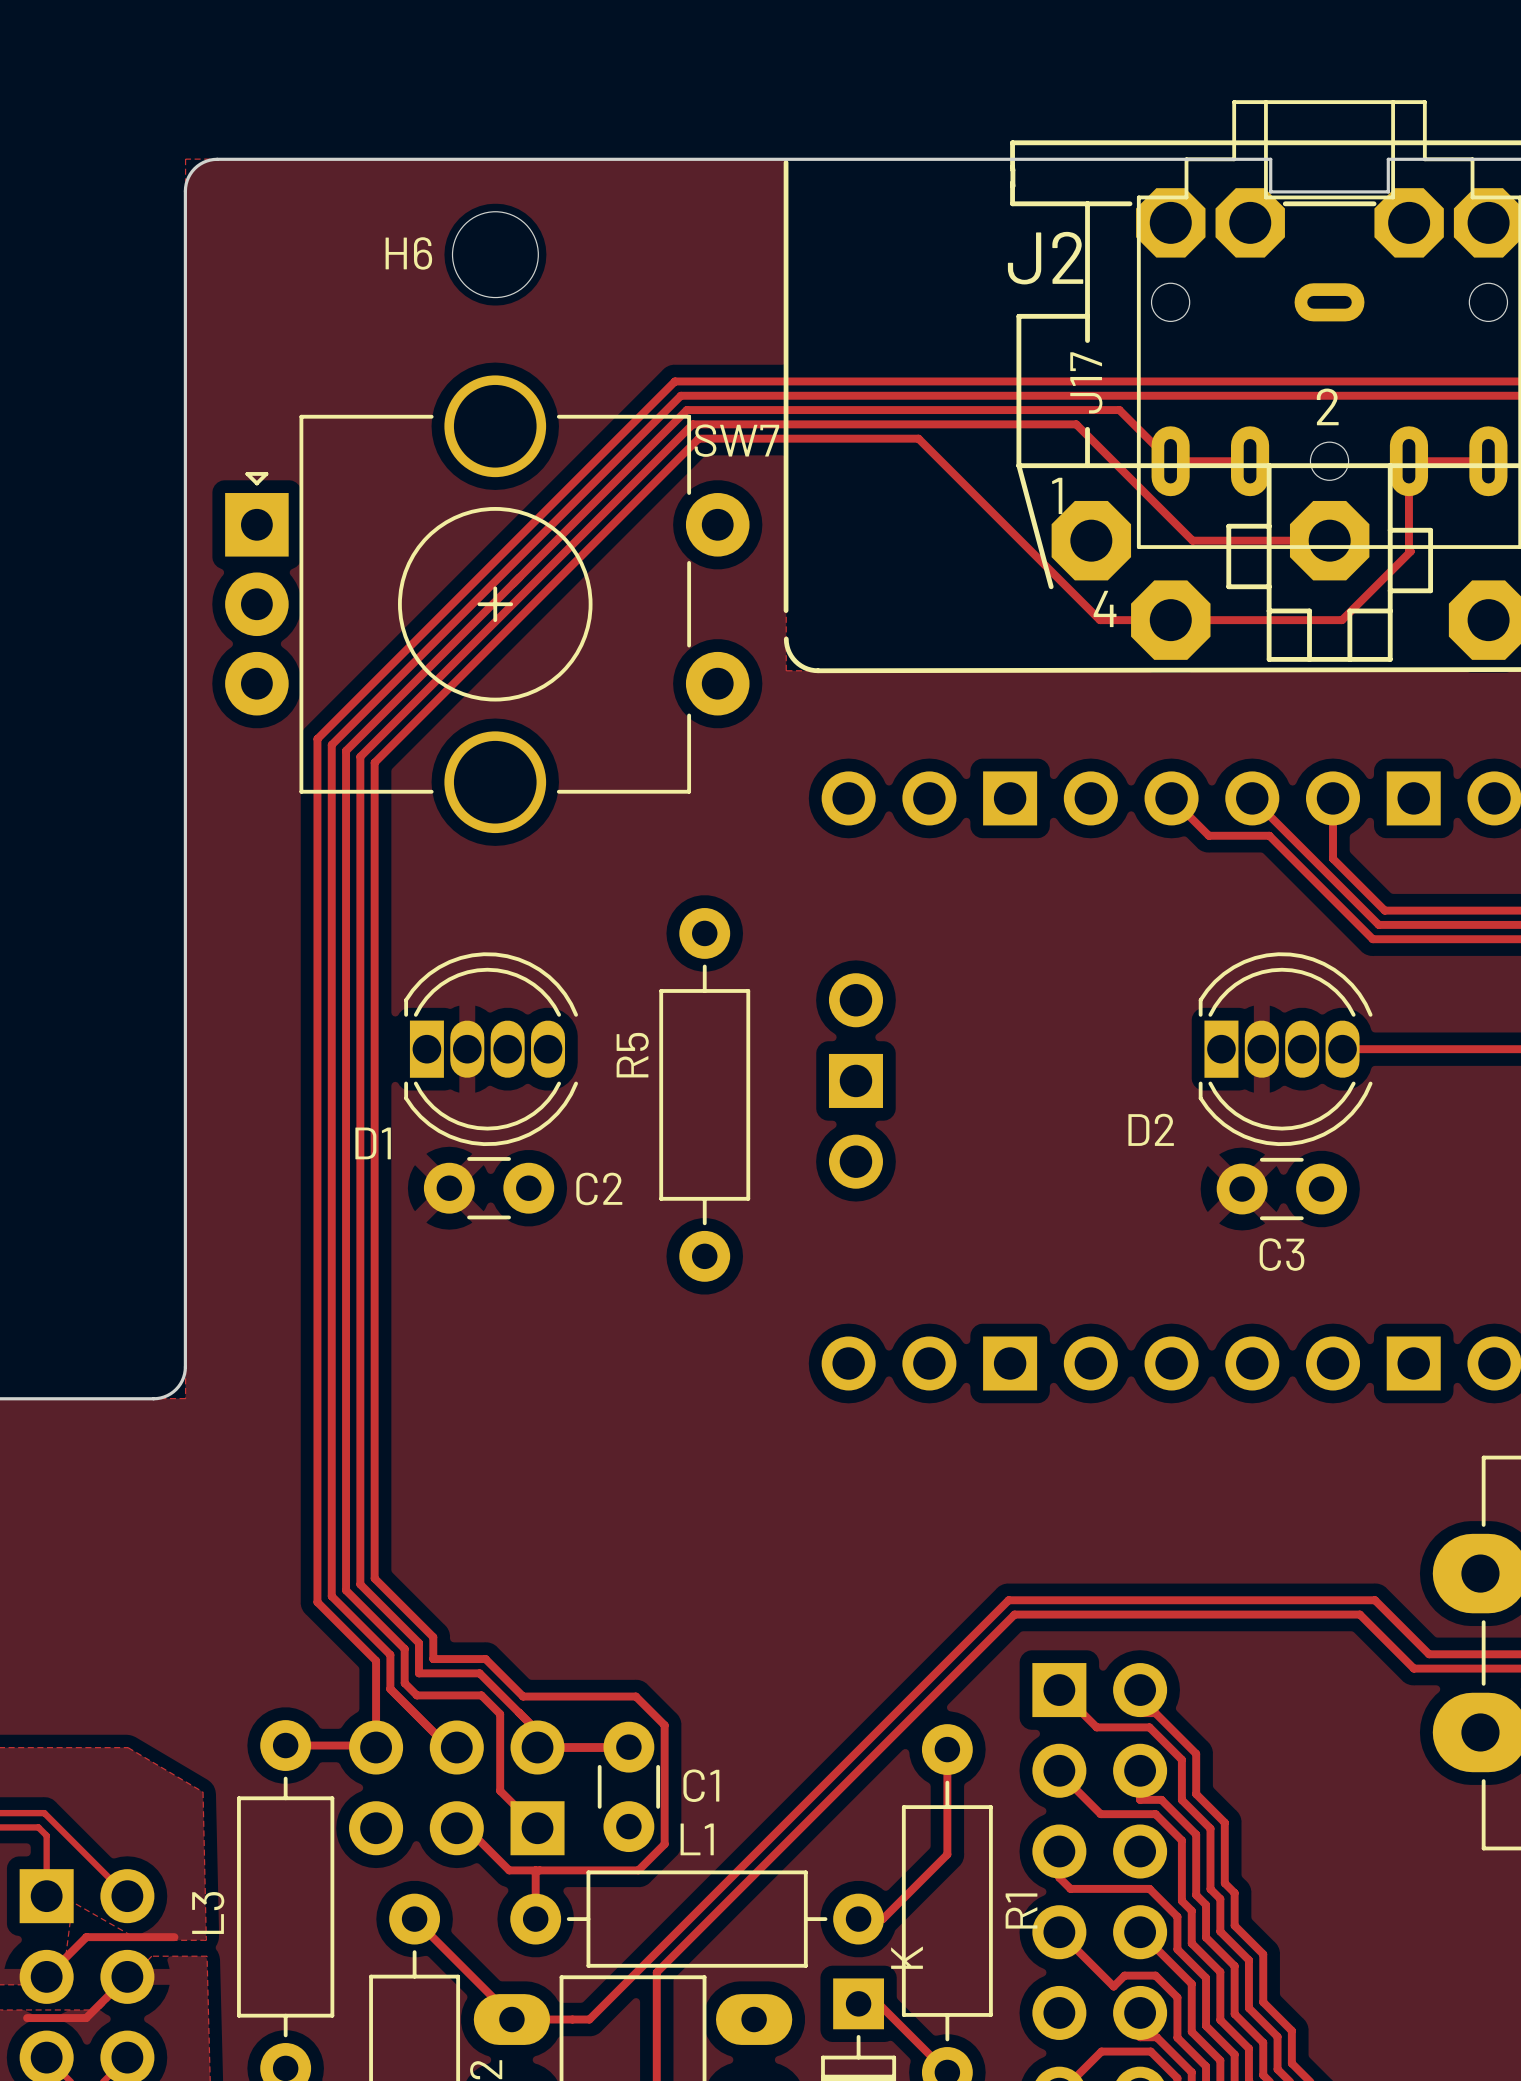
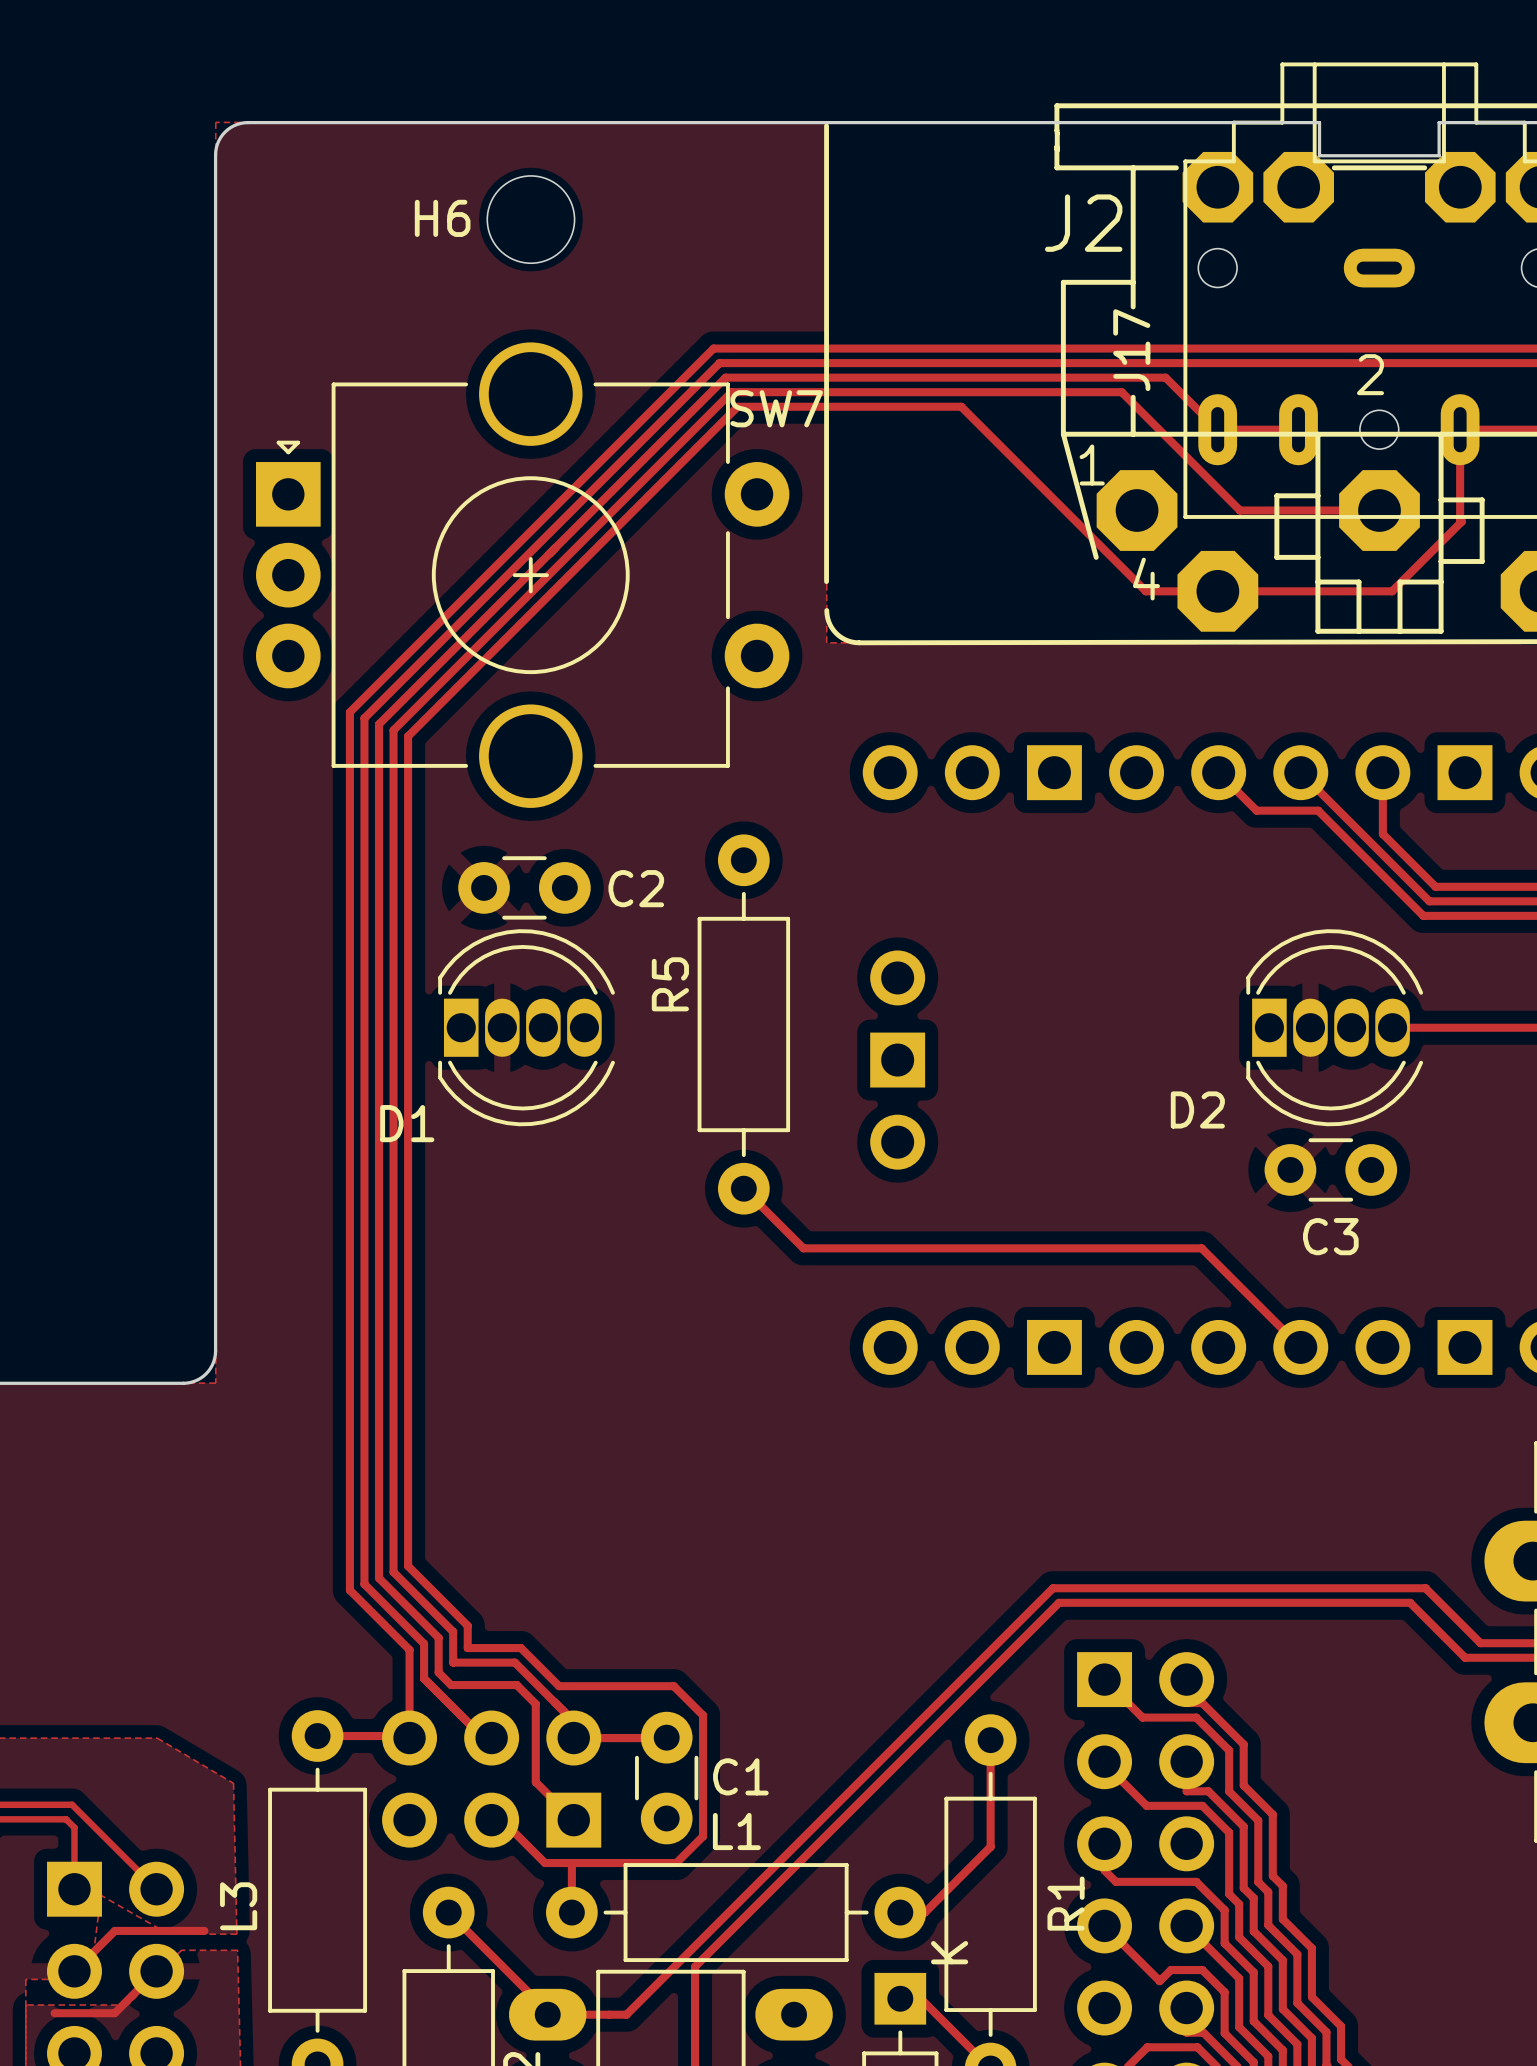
R5 position: (704, 1094) -> (743, 1024)
C2 position: (489, 1188) -> (524, 887)
track: none -> (743, 1188) (803, 1248) (1201, 1248) (1300, 1347)

